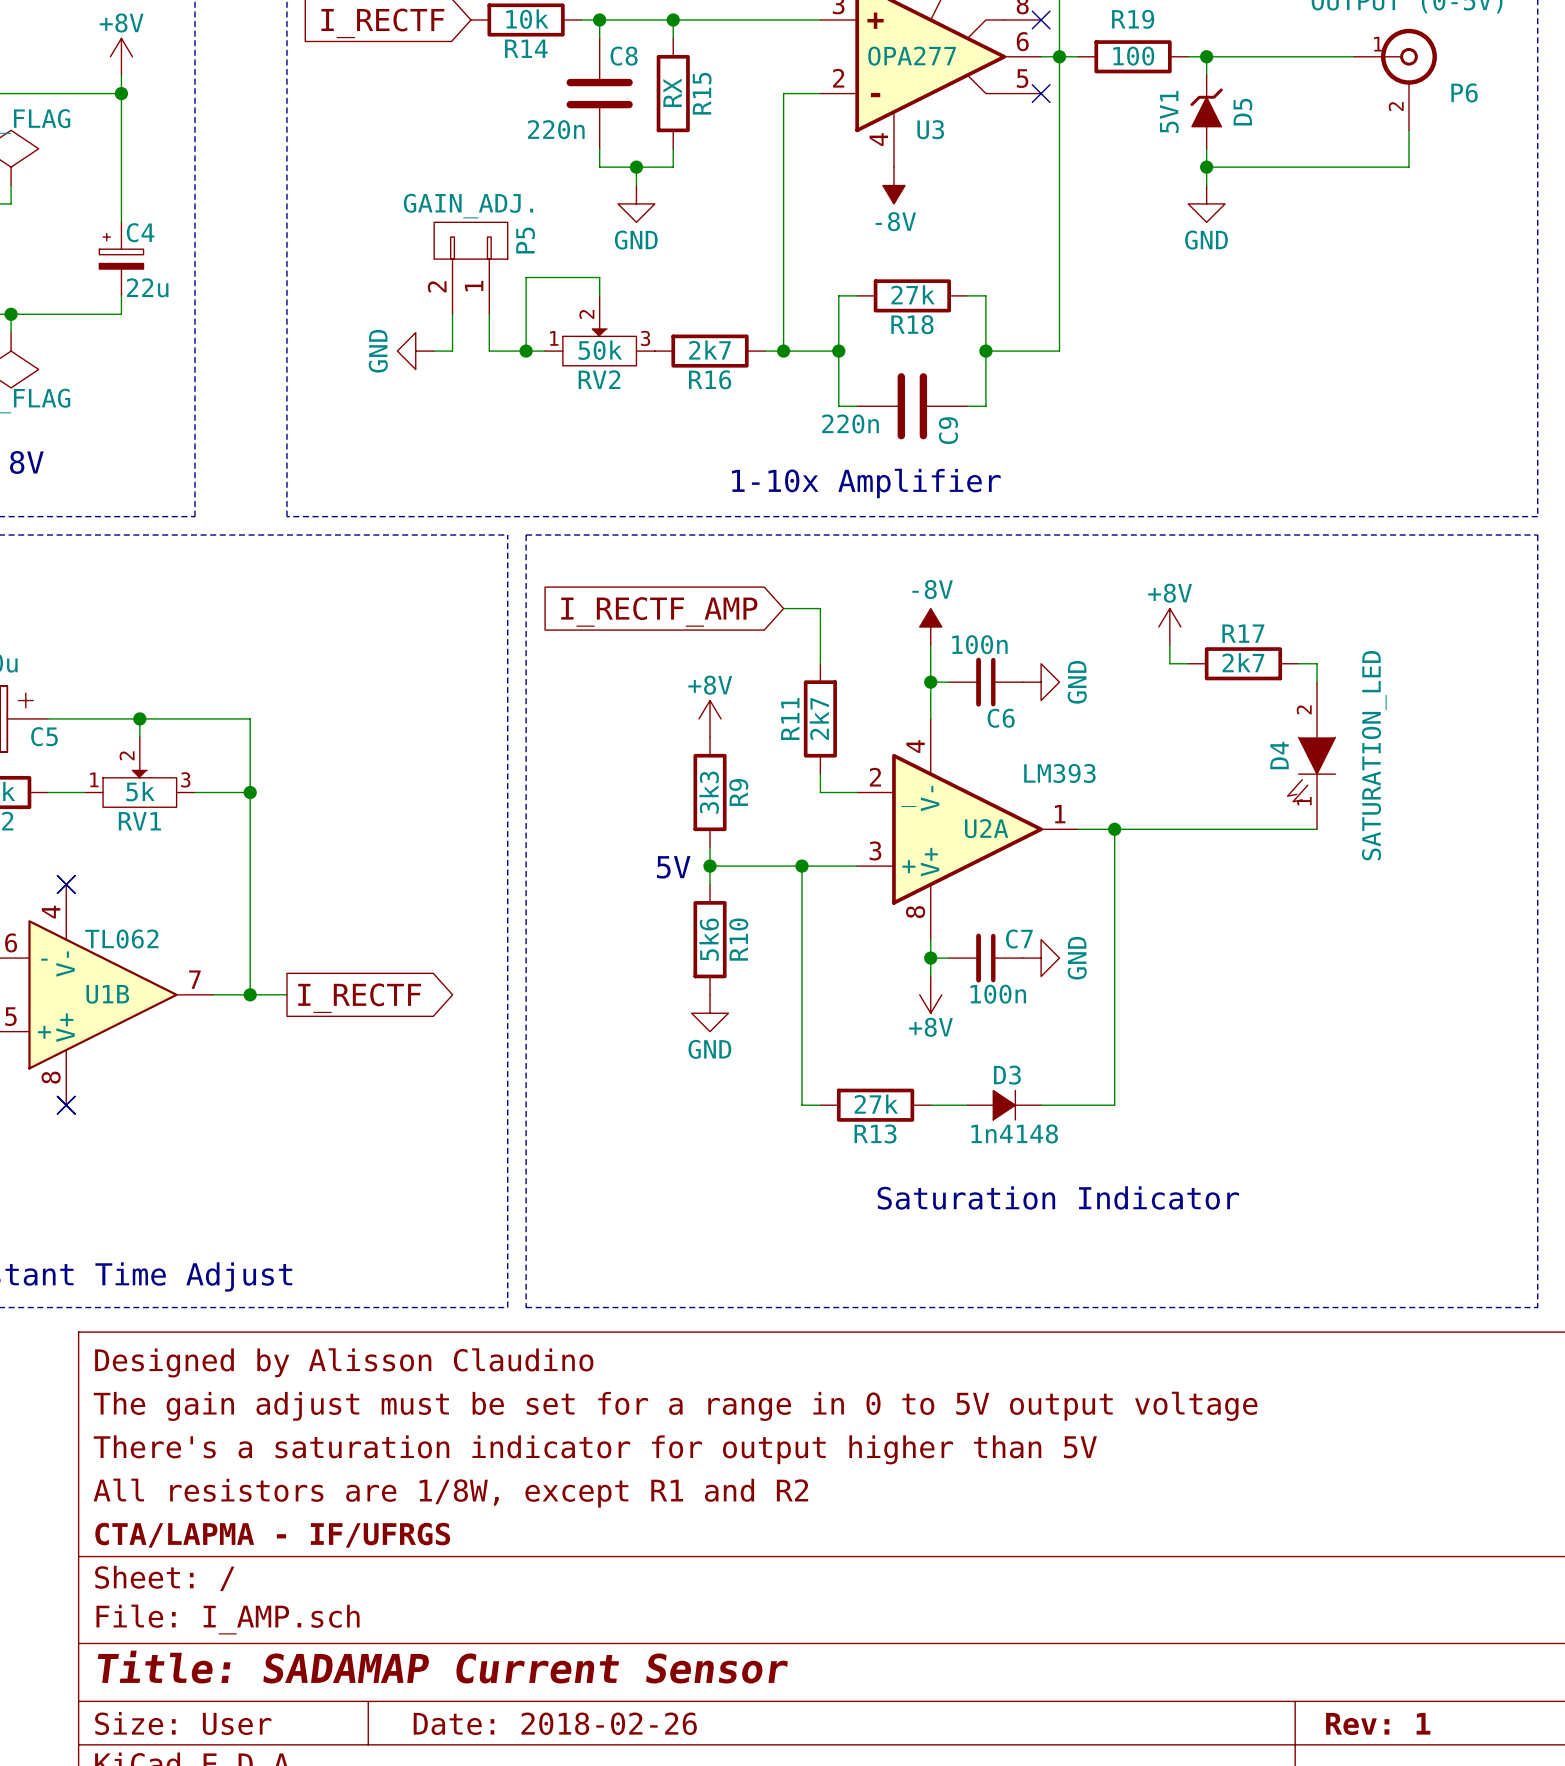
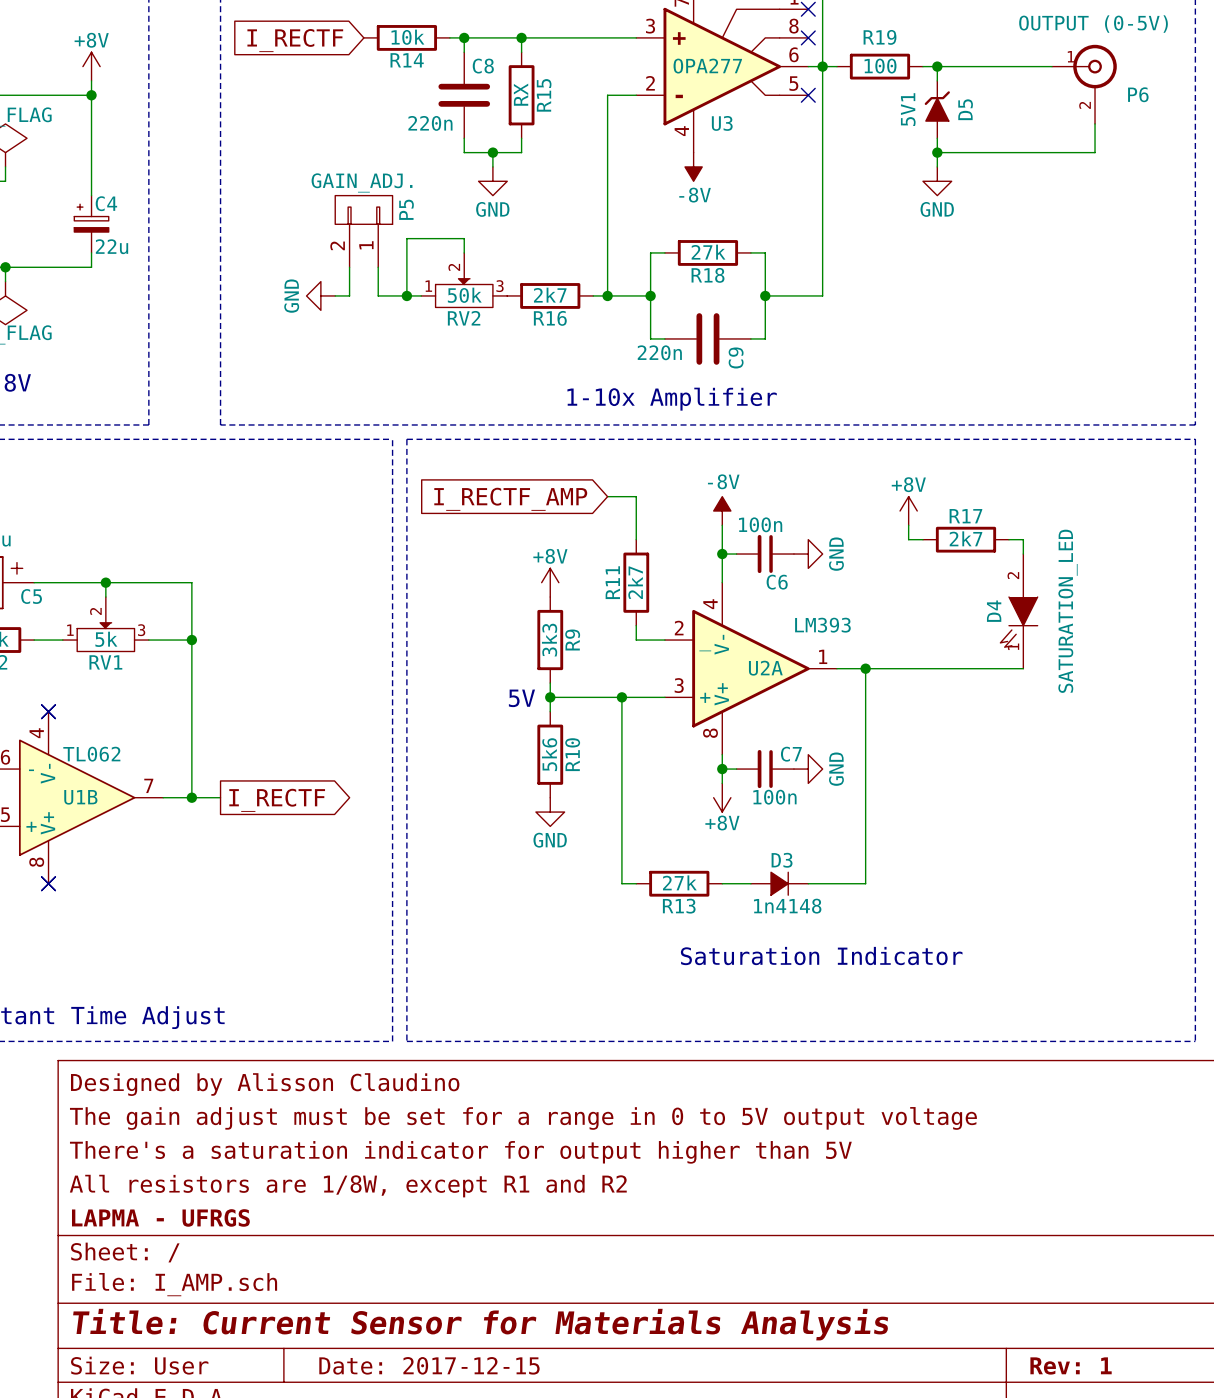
title block: CTA/LAPMA - IF/UFRGS (272, 1535) -> LAPMA - UFRGS (160, 1217)
title block: Title: SADAMAP Current Sensor (442, 1667) -> Title: Current Sensor for Materials Analysis (480, 1324)
title block: Date: 2018-02-26 (555, 1723) -> Date: 2017-12-15 (429, 1365)

